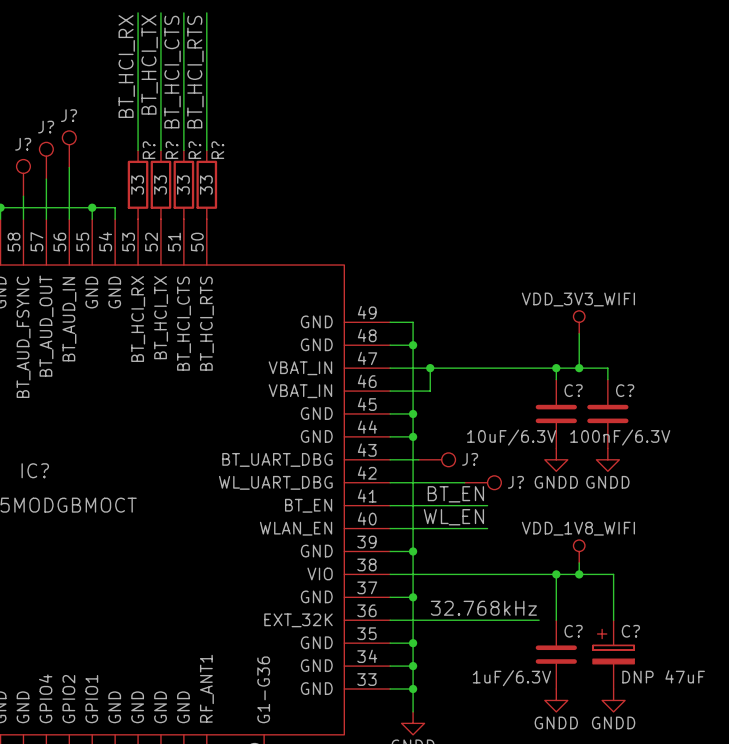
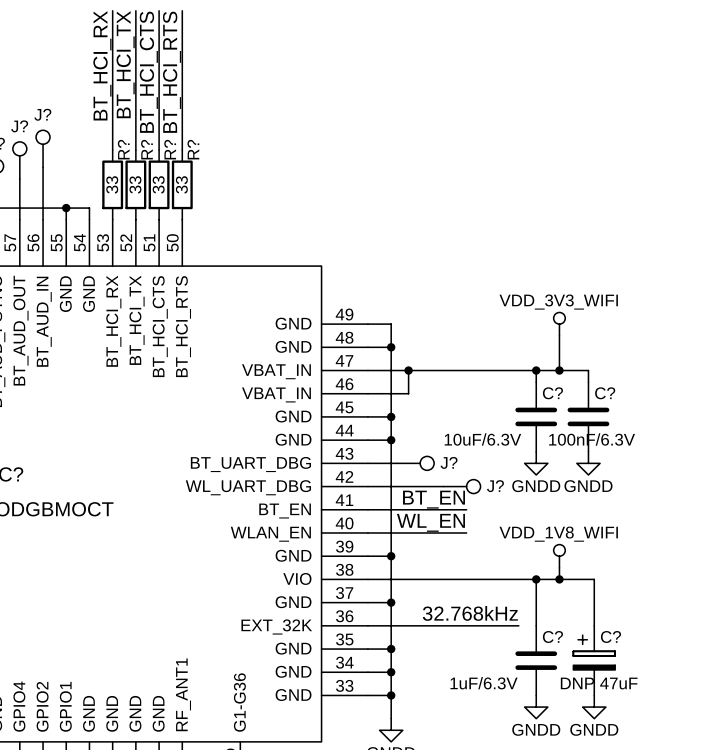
C? value position: DNP 47uF (663, 676) -> DNP 47uF (599, 683)

